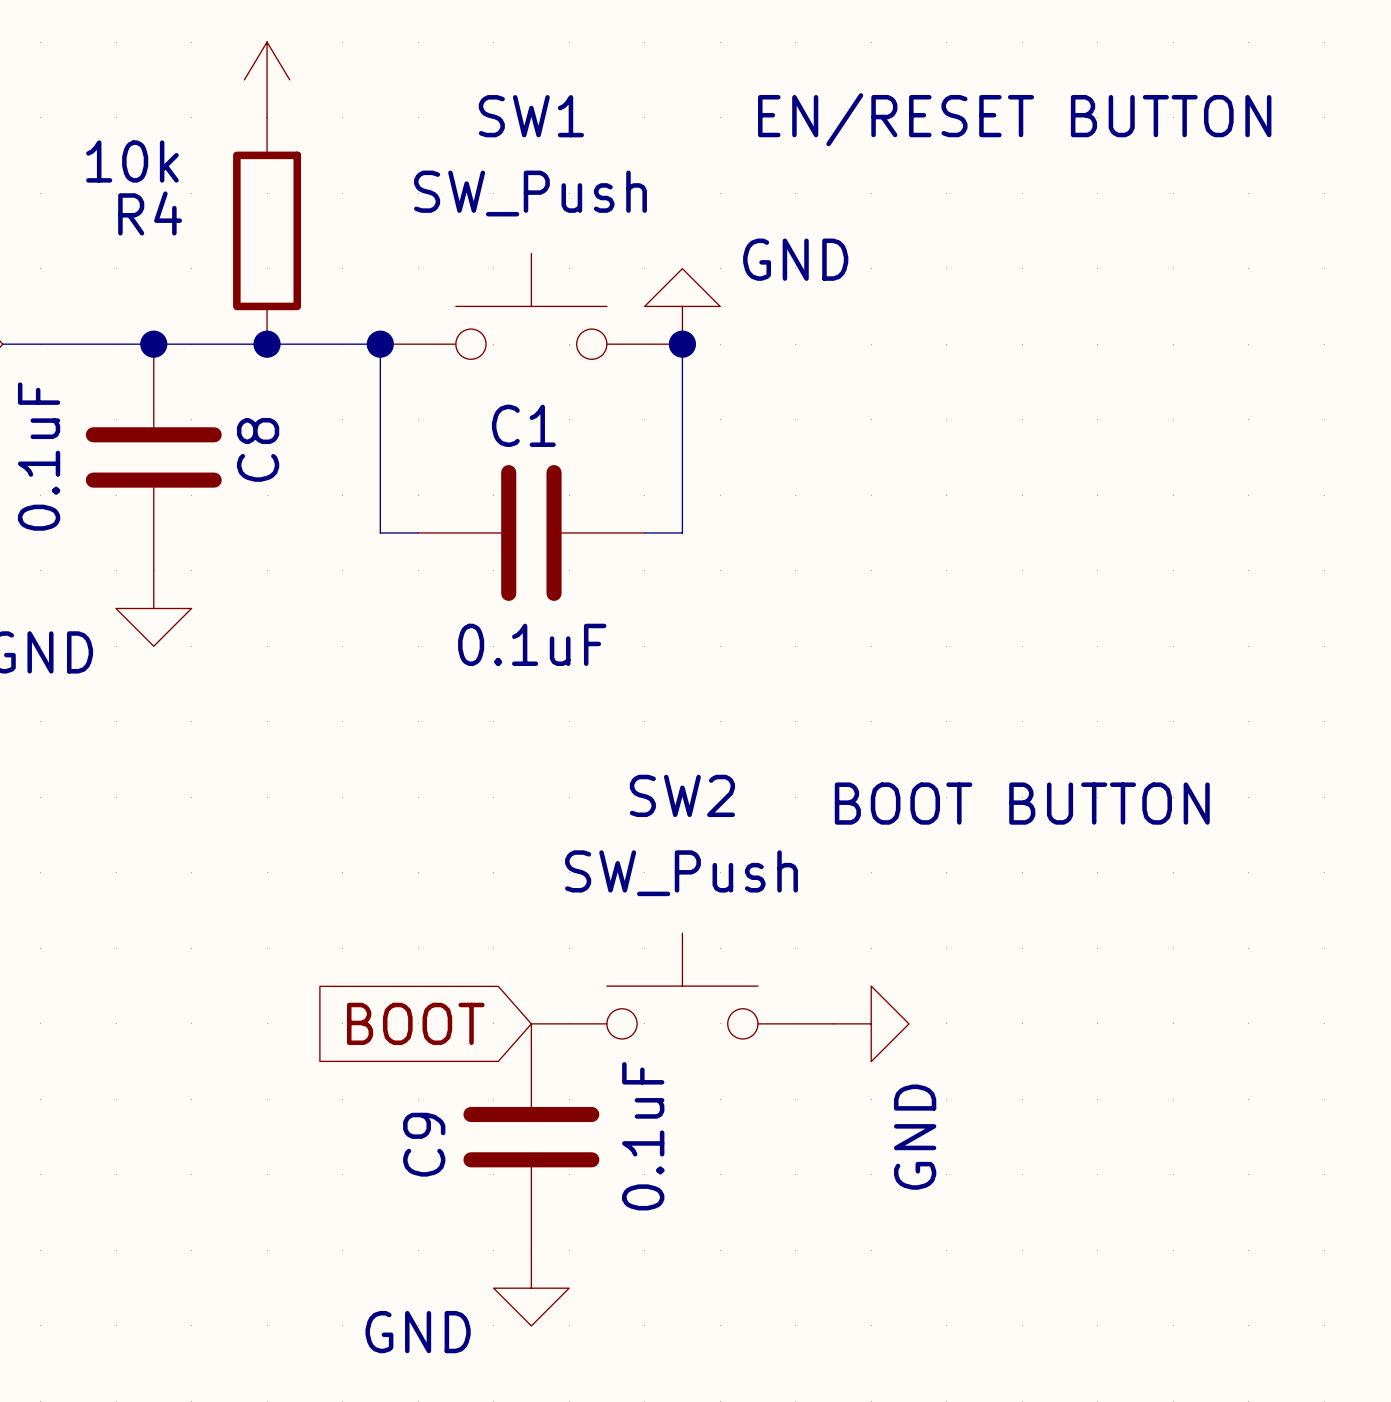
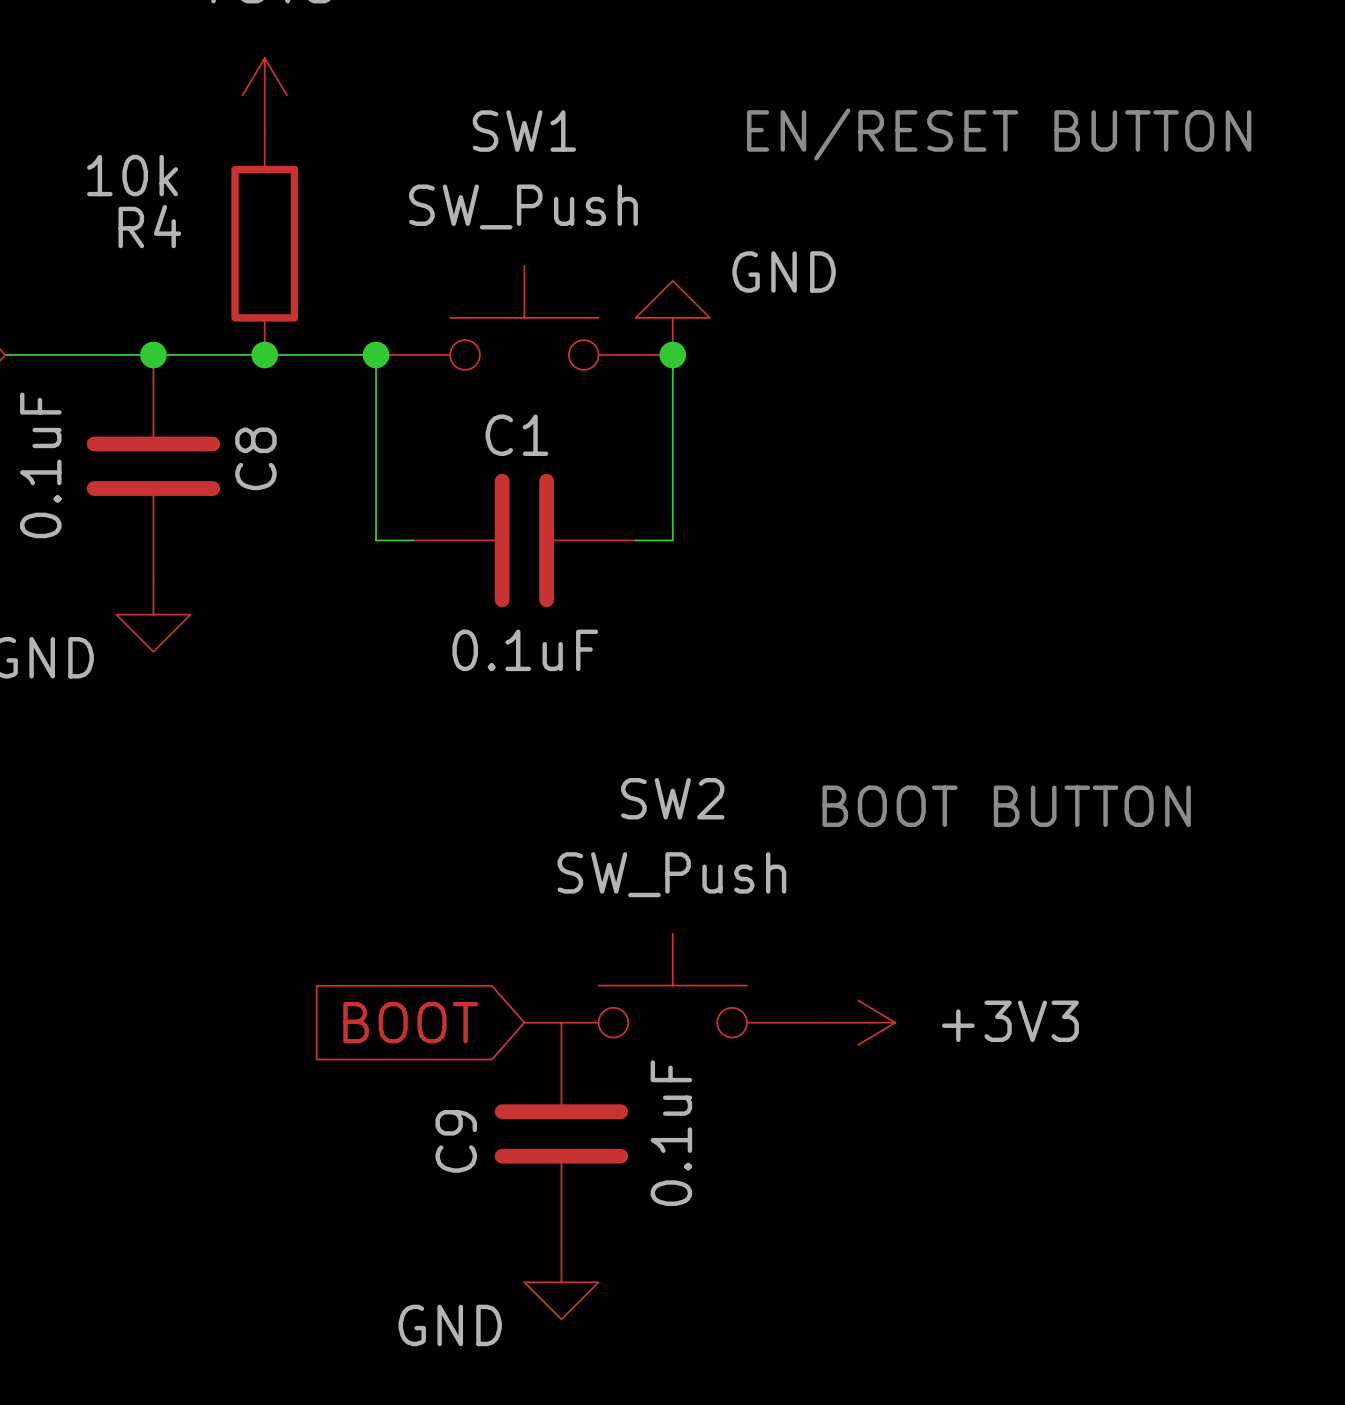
power symbol: GND (871, 1023) -> +3V3 (858, 1022)
C9 position: (531, 1137) -> (561, 1133)
power symbol position: GND (531, 1288) -> GND (561, 1282)

